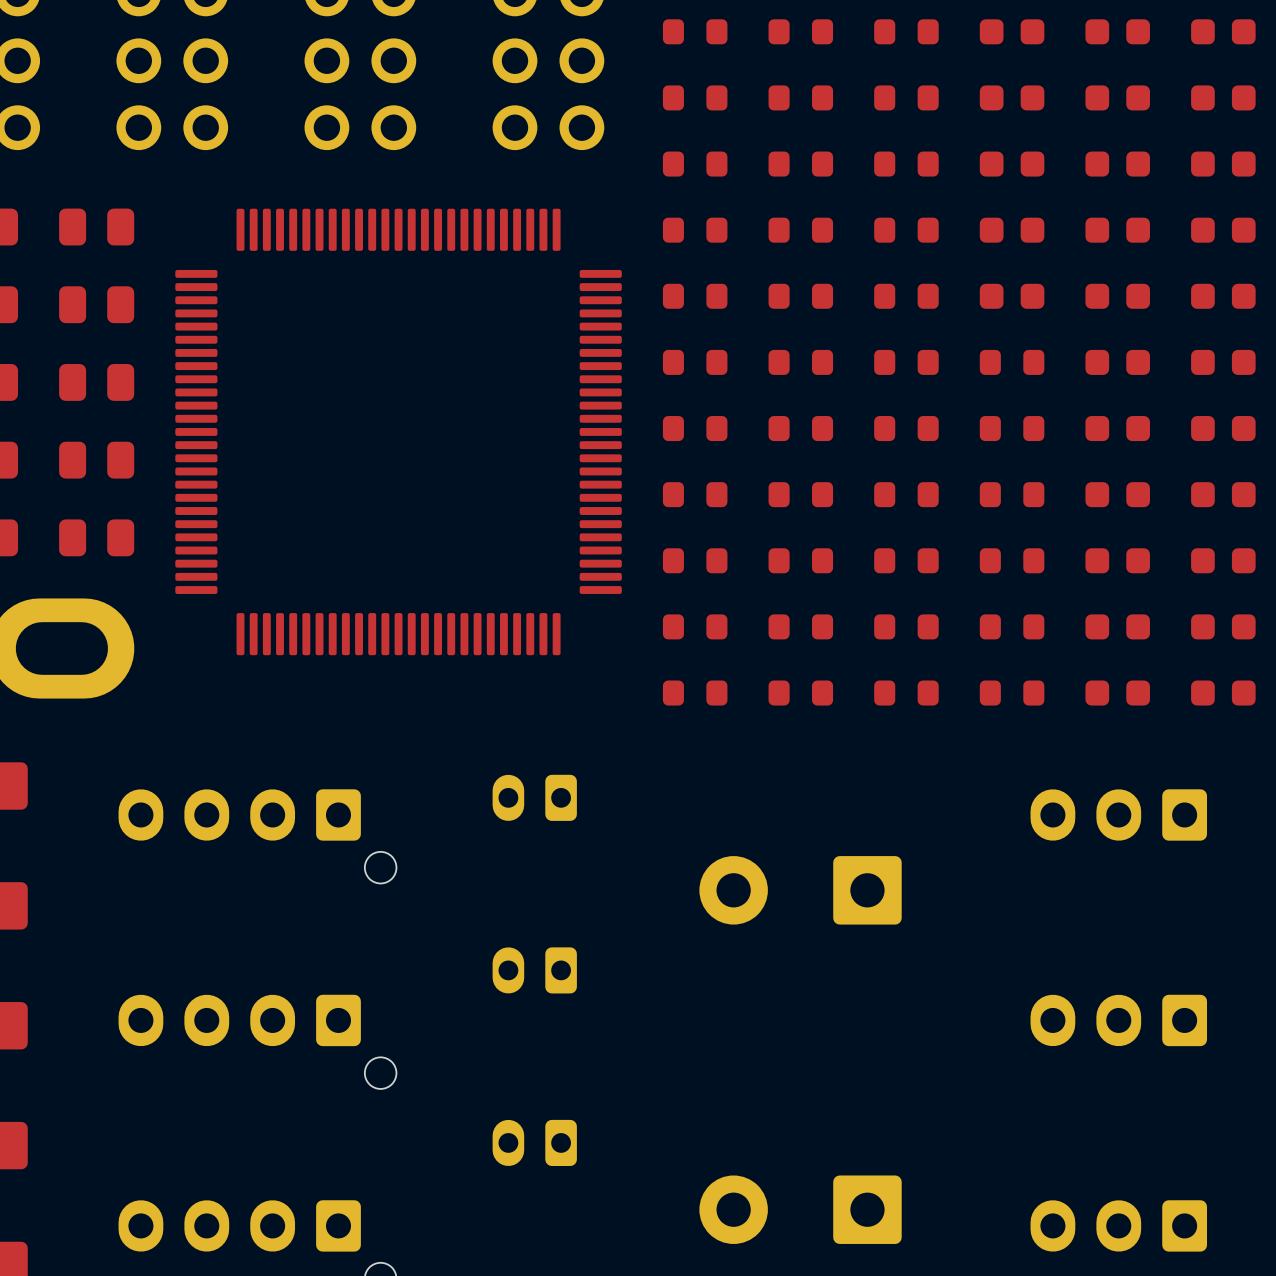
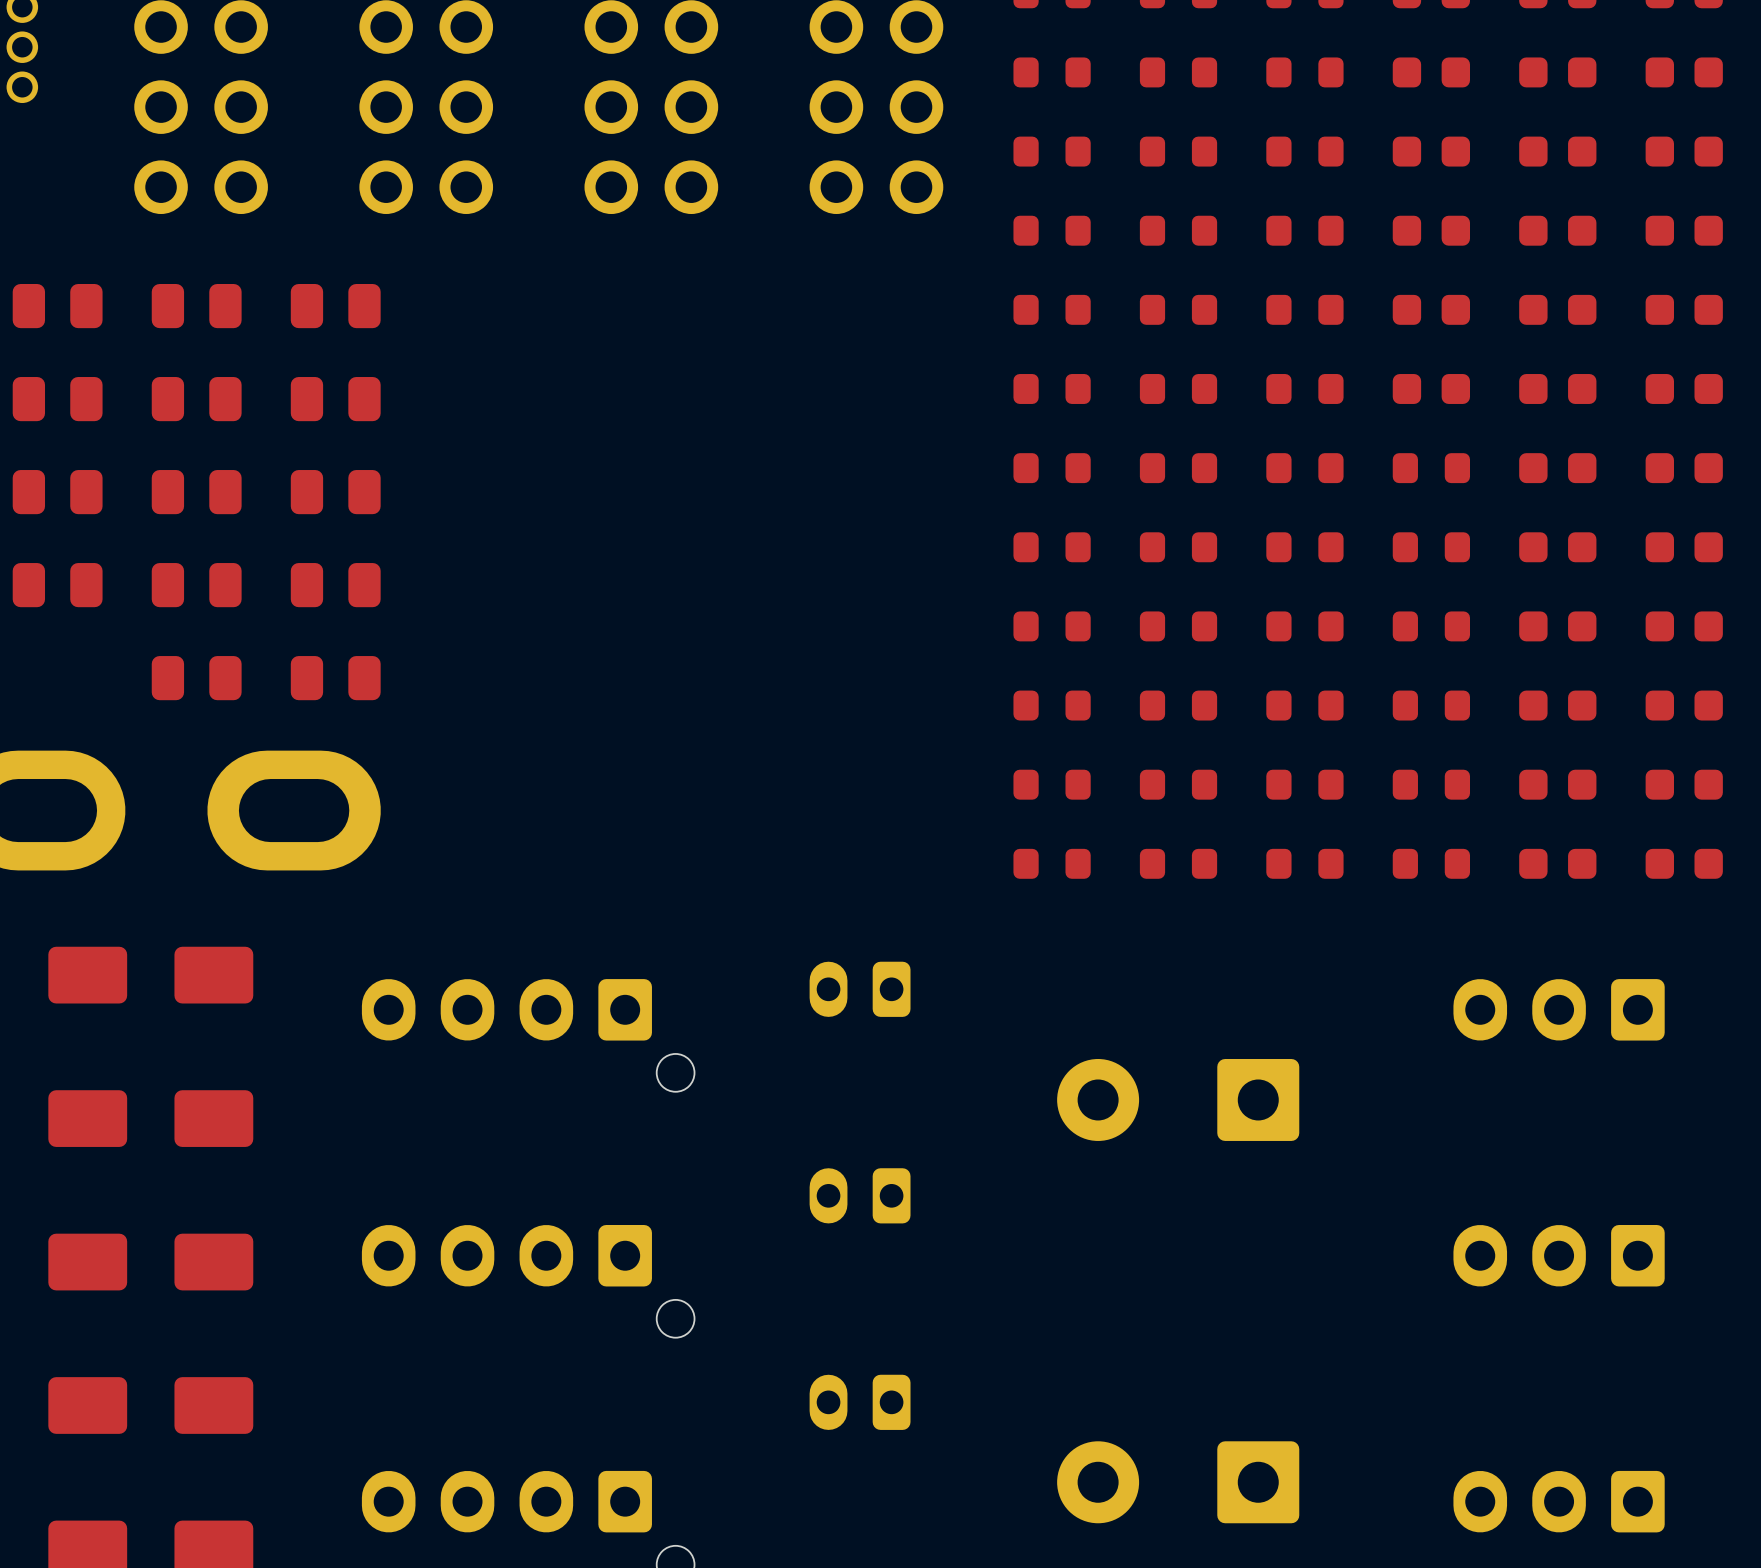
part: (398, 431) -> none

